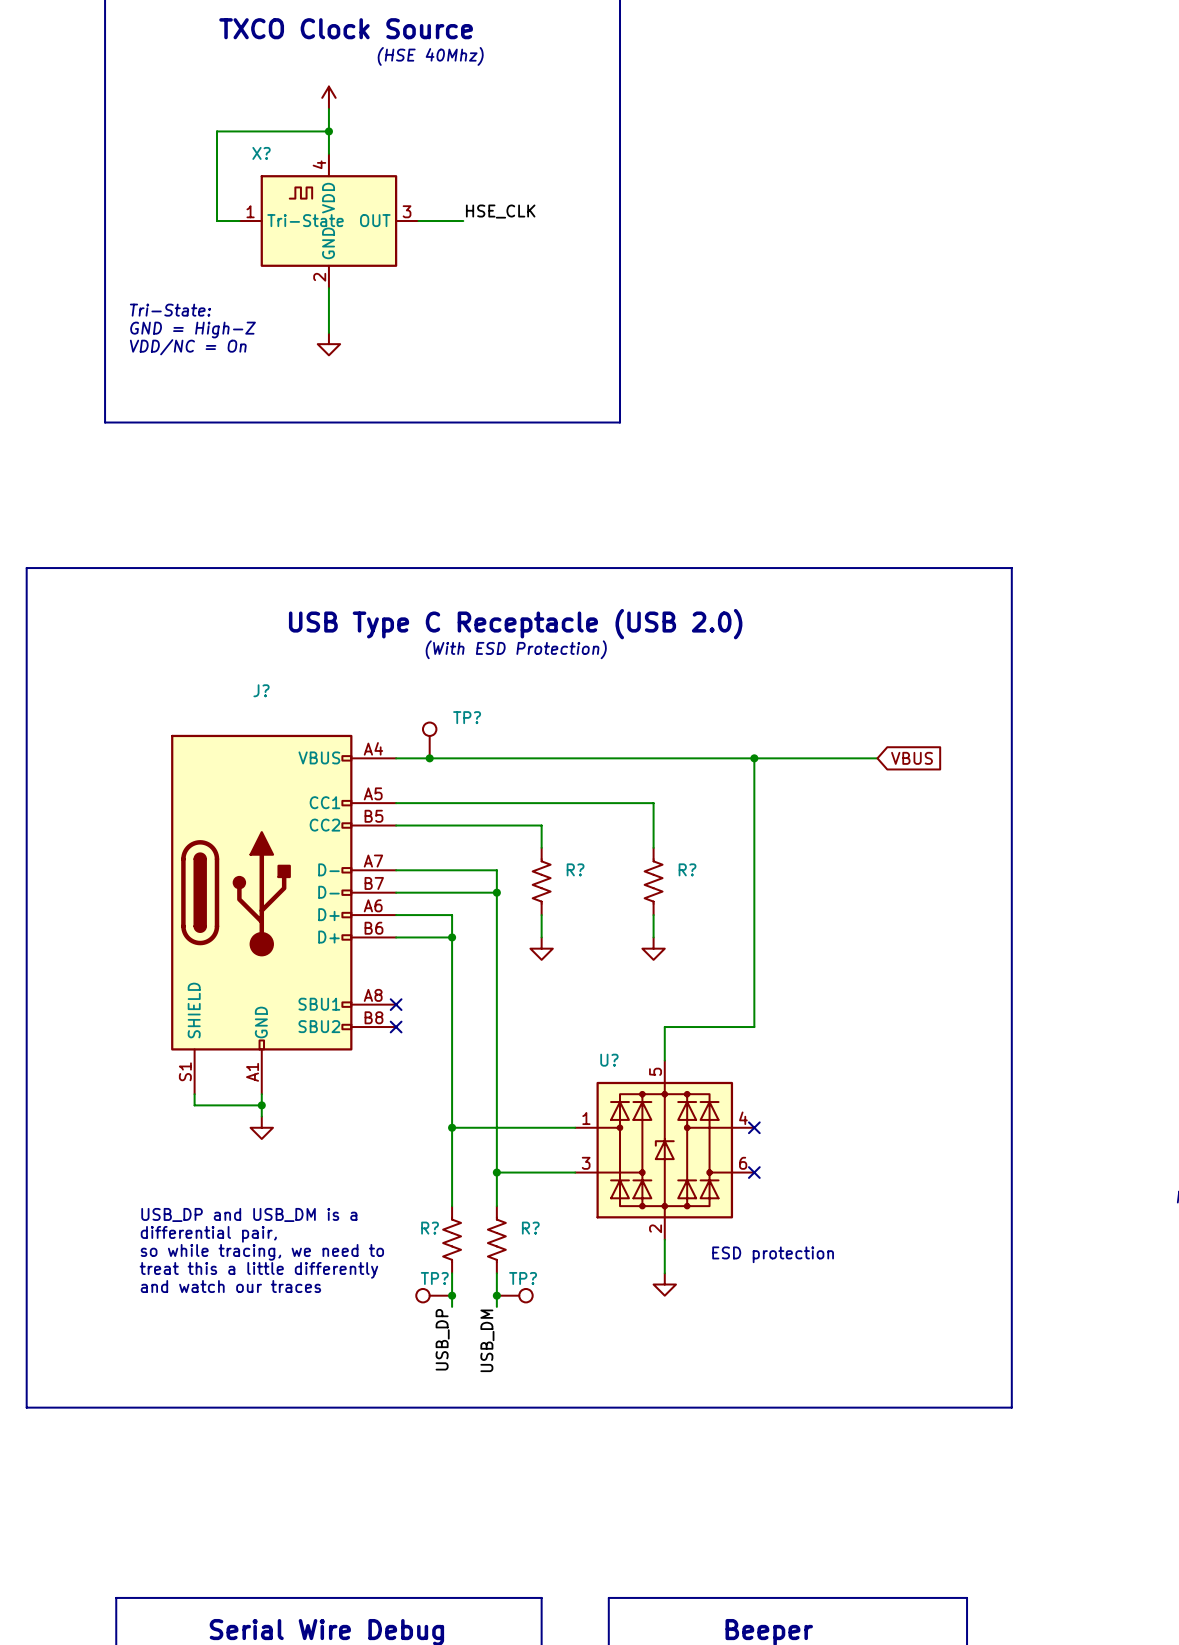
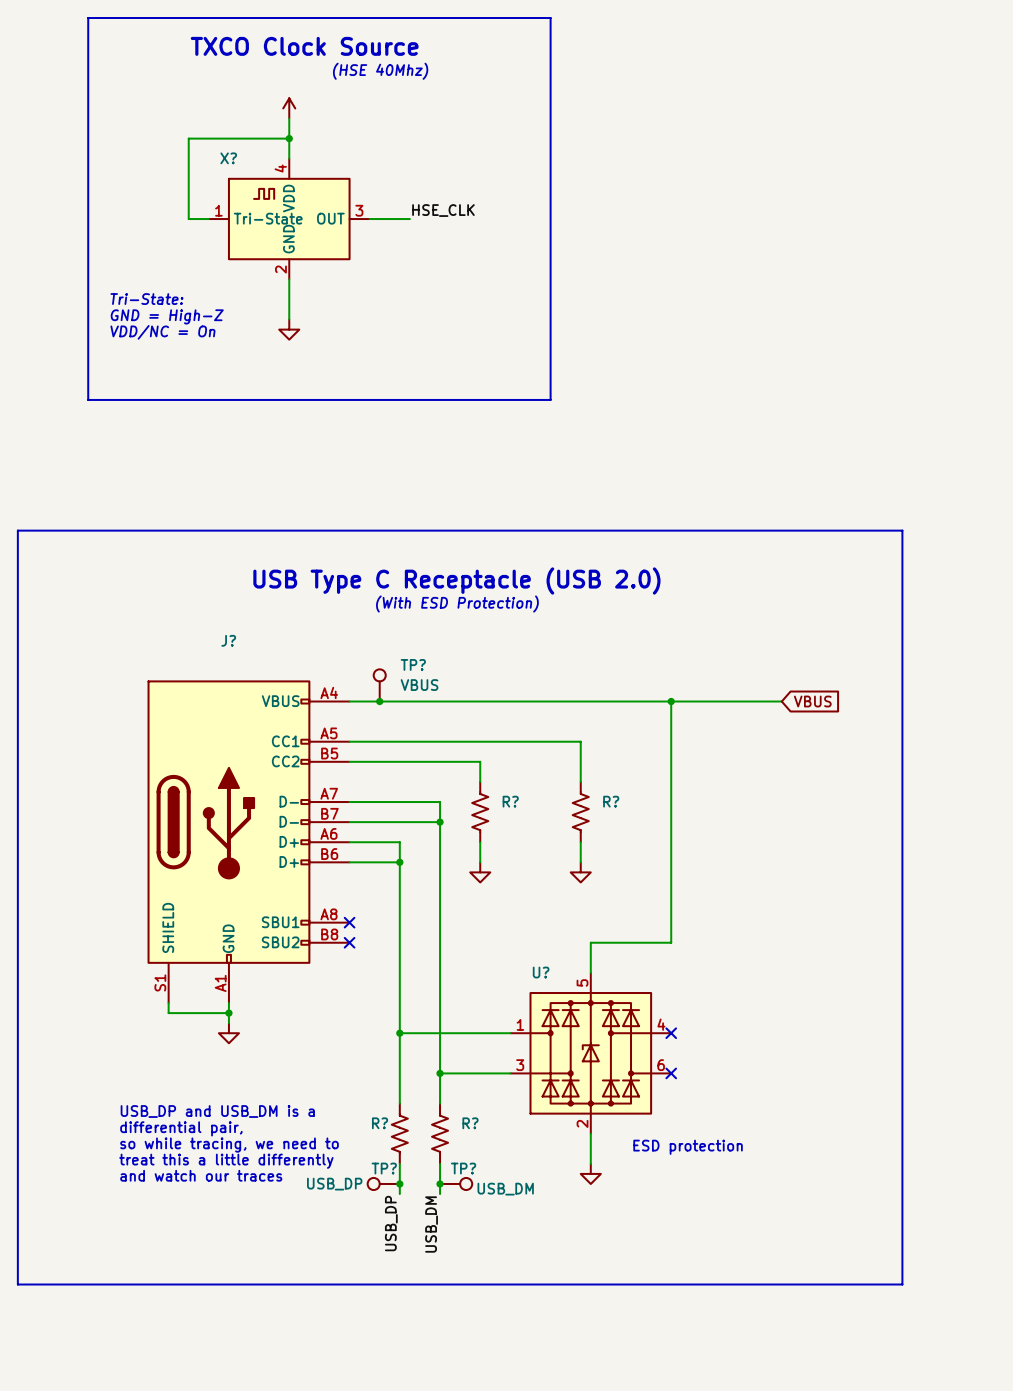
TP? value: none -> VBUS (419, 685)
TP? value: none -> USB_DP (334, 1184)
TP? value: none -> USB_DM (505, 1189)

